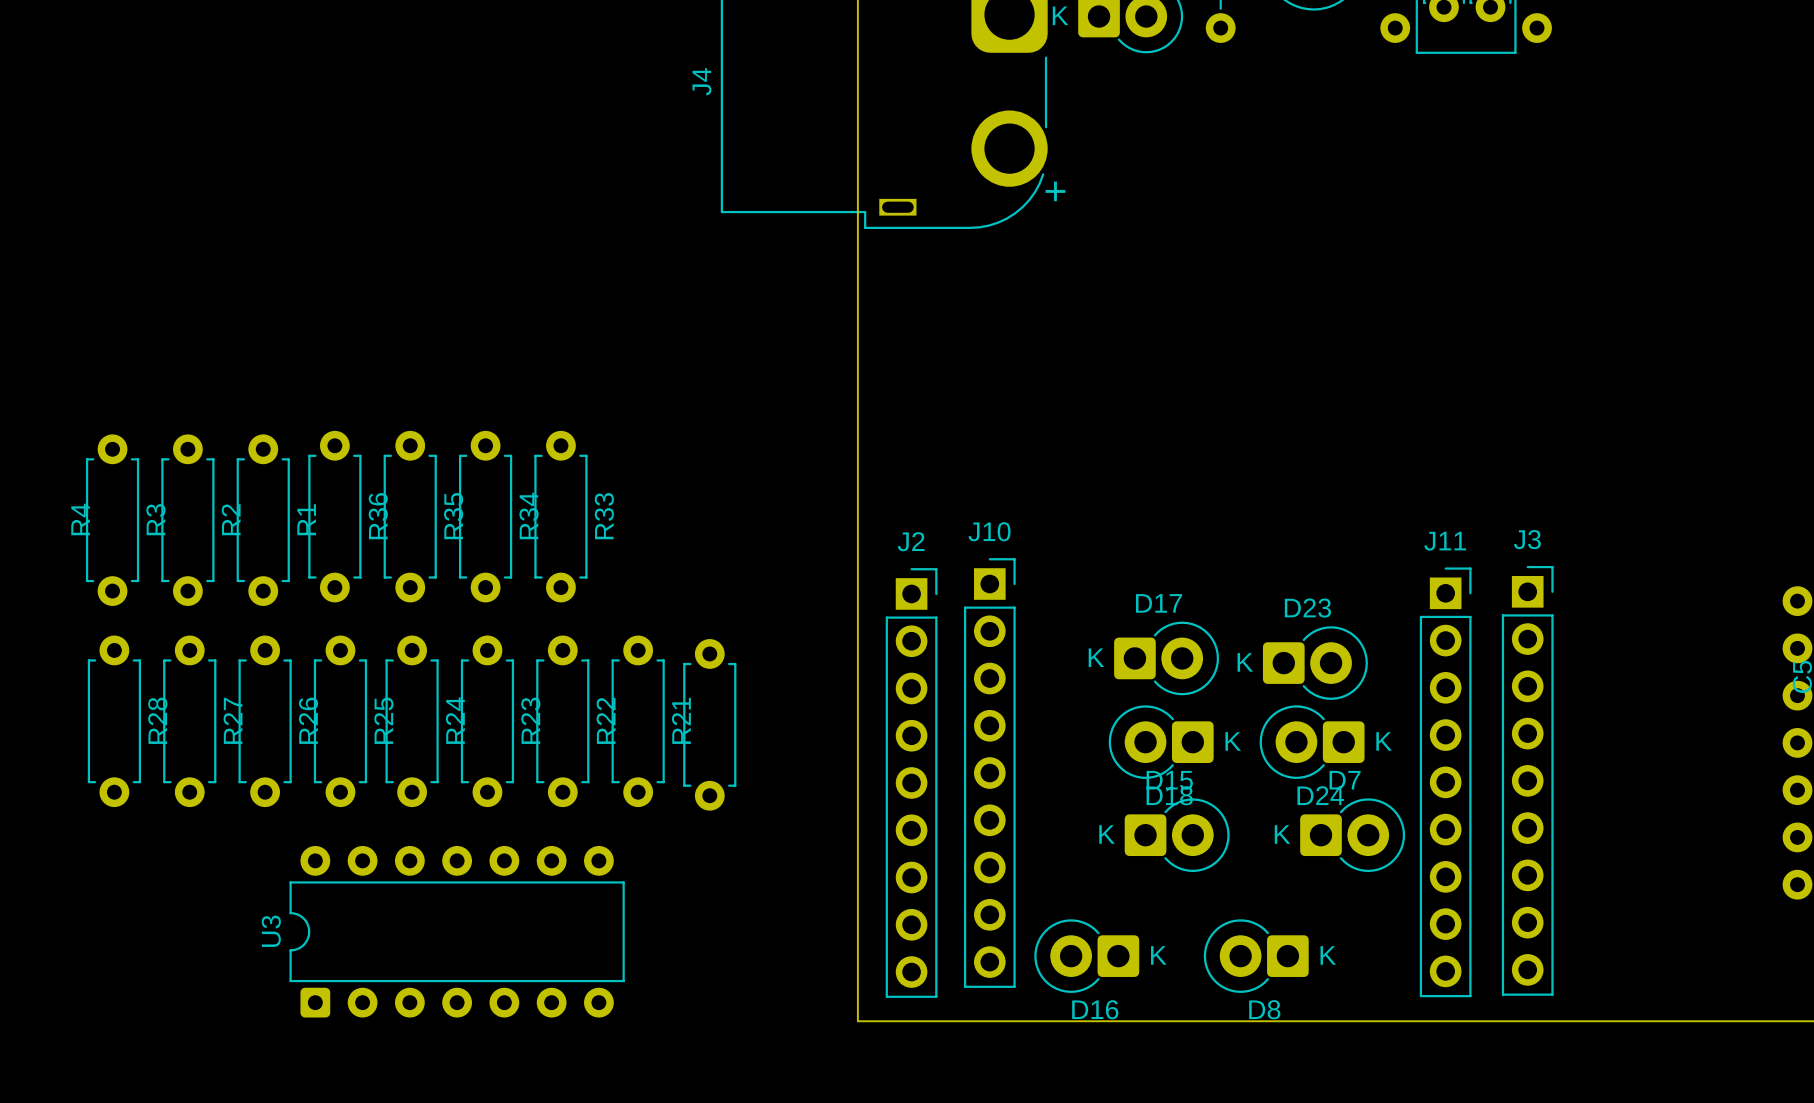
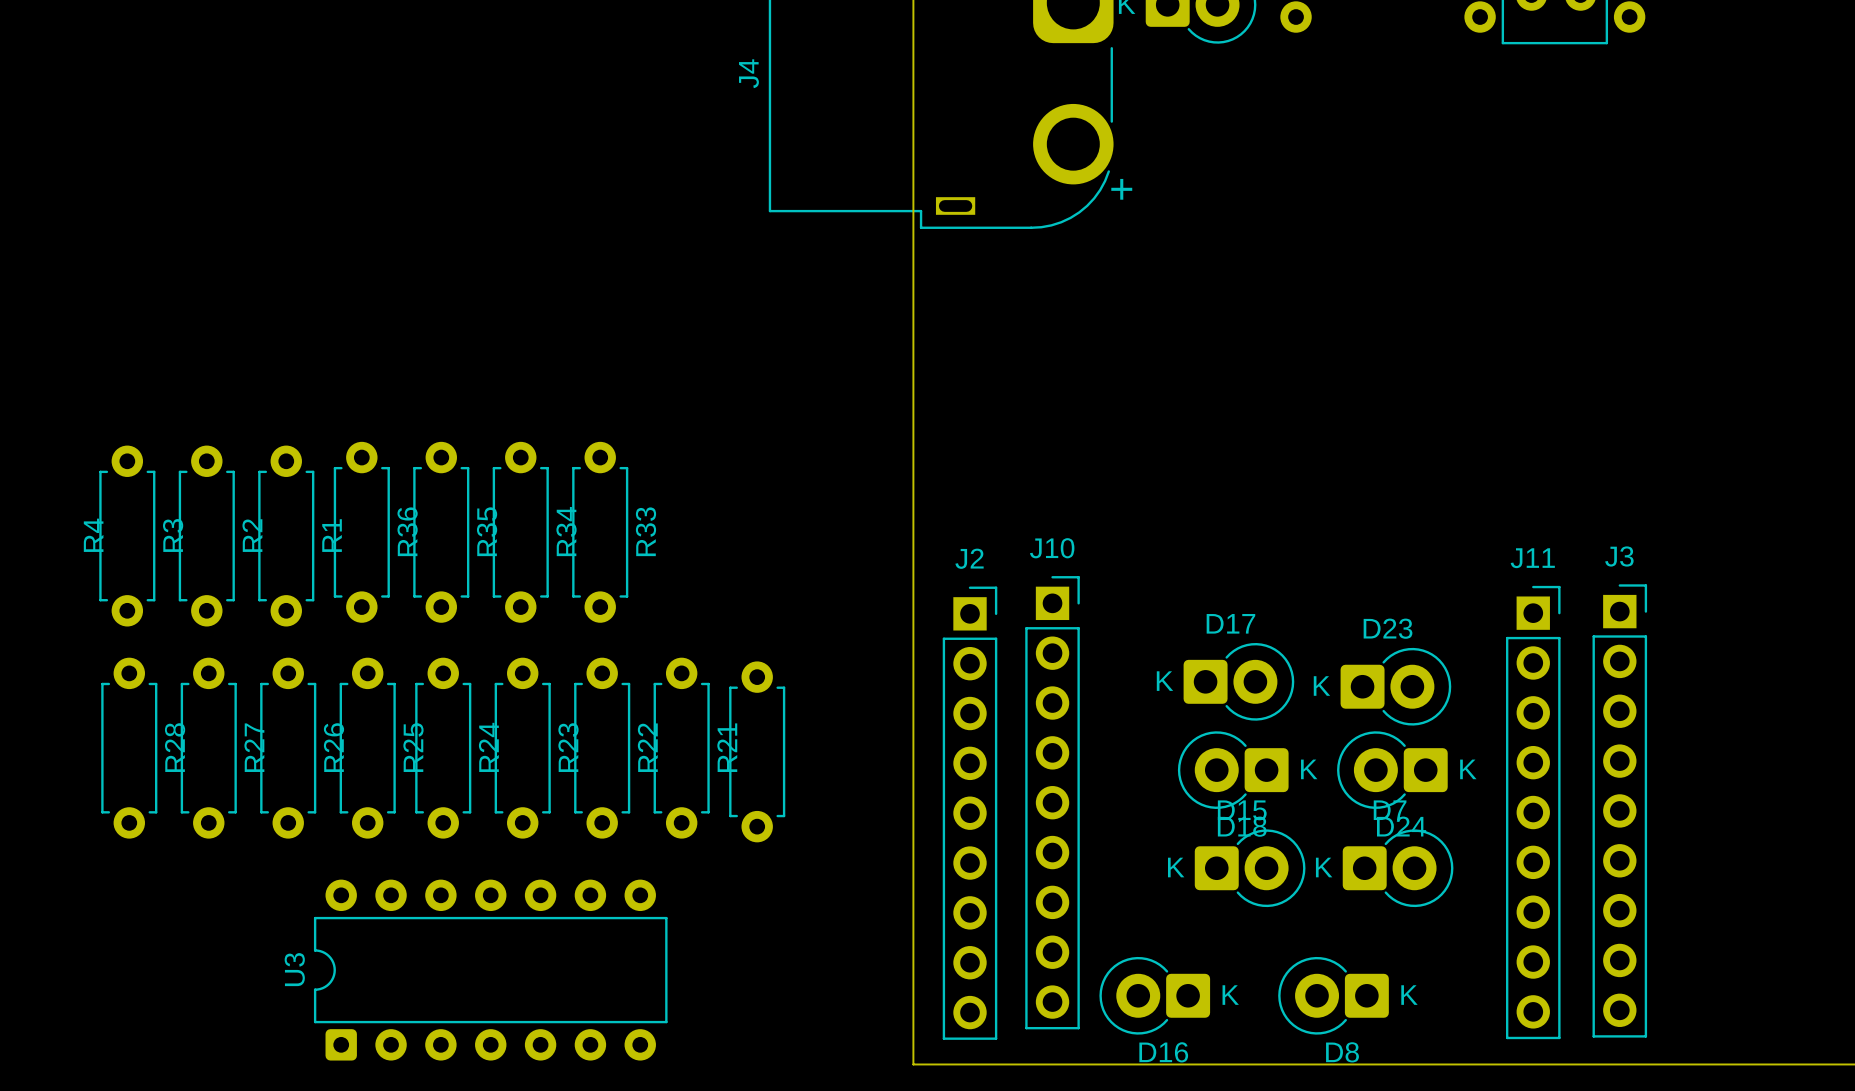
D7 position: (1352, 835) -> (1398, 868)

